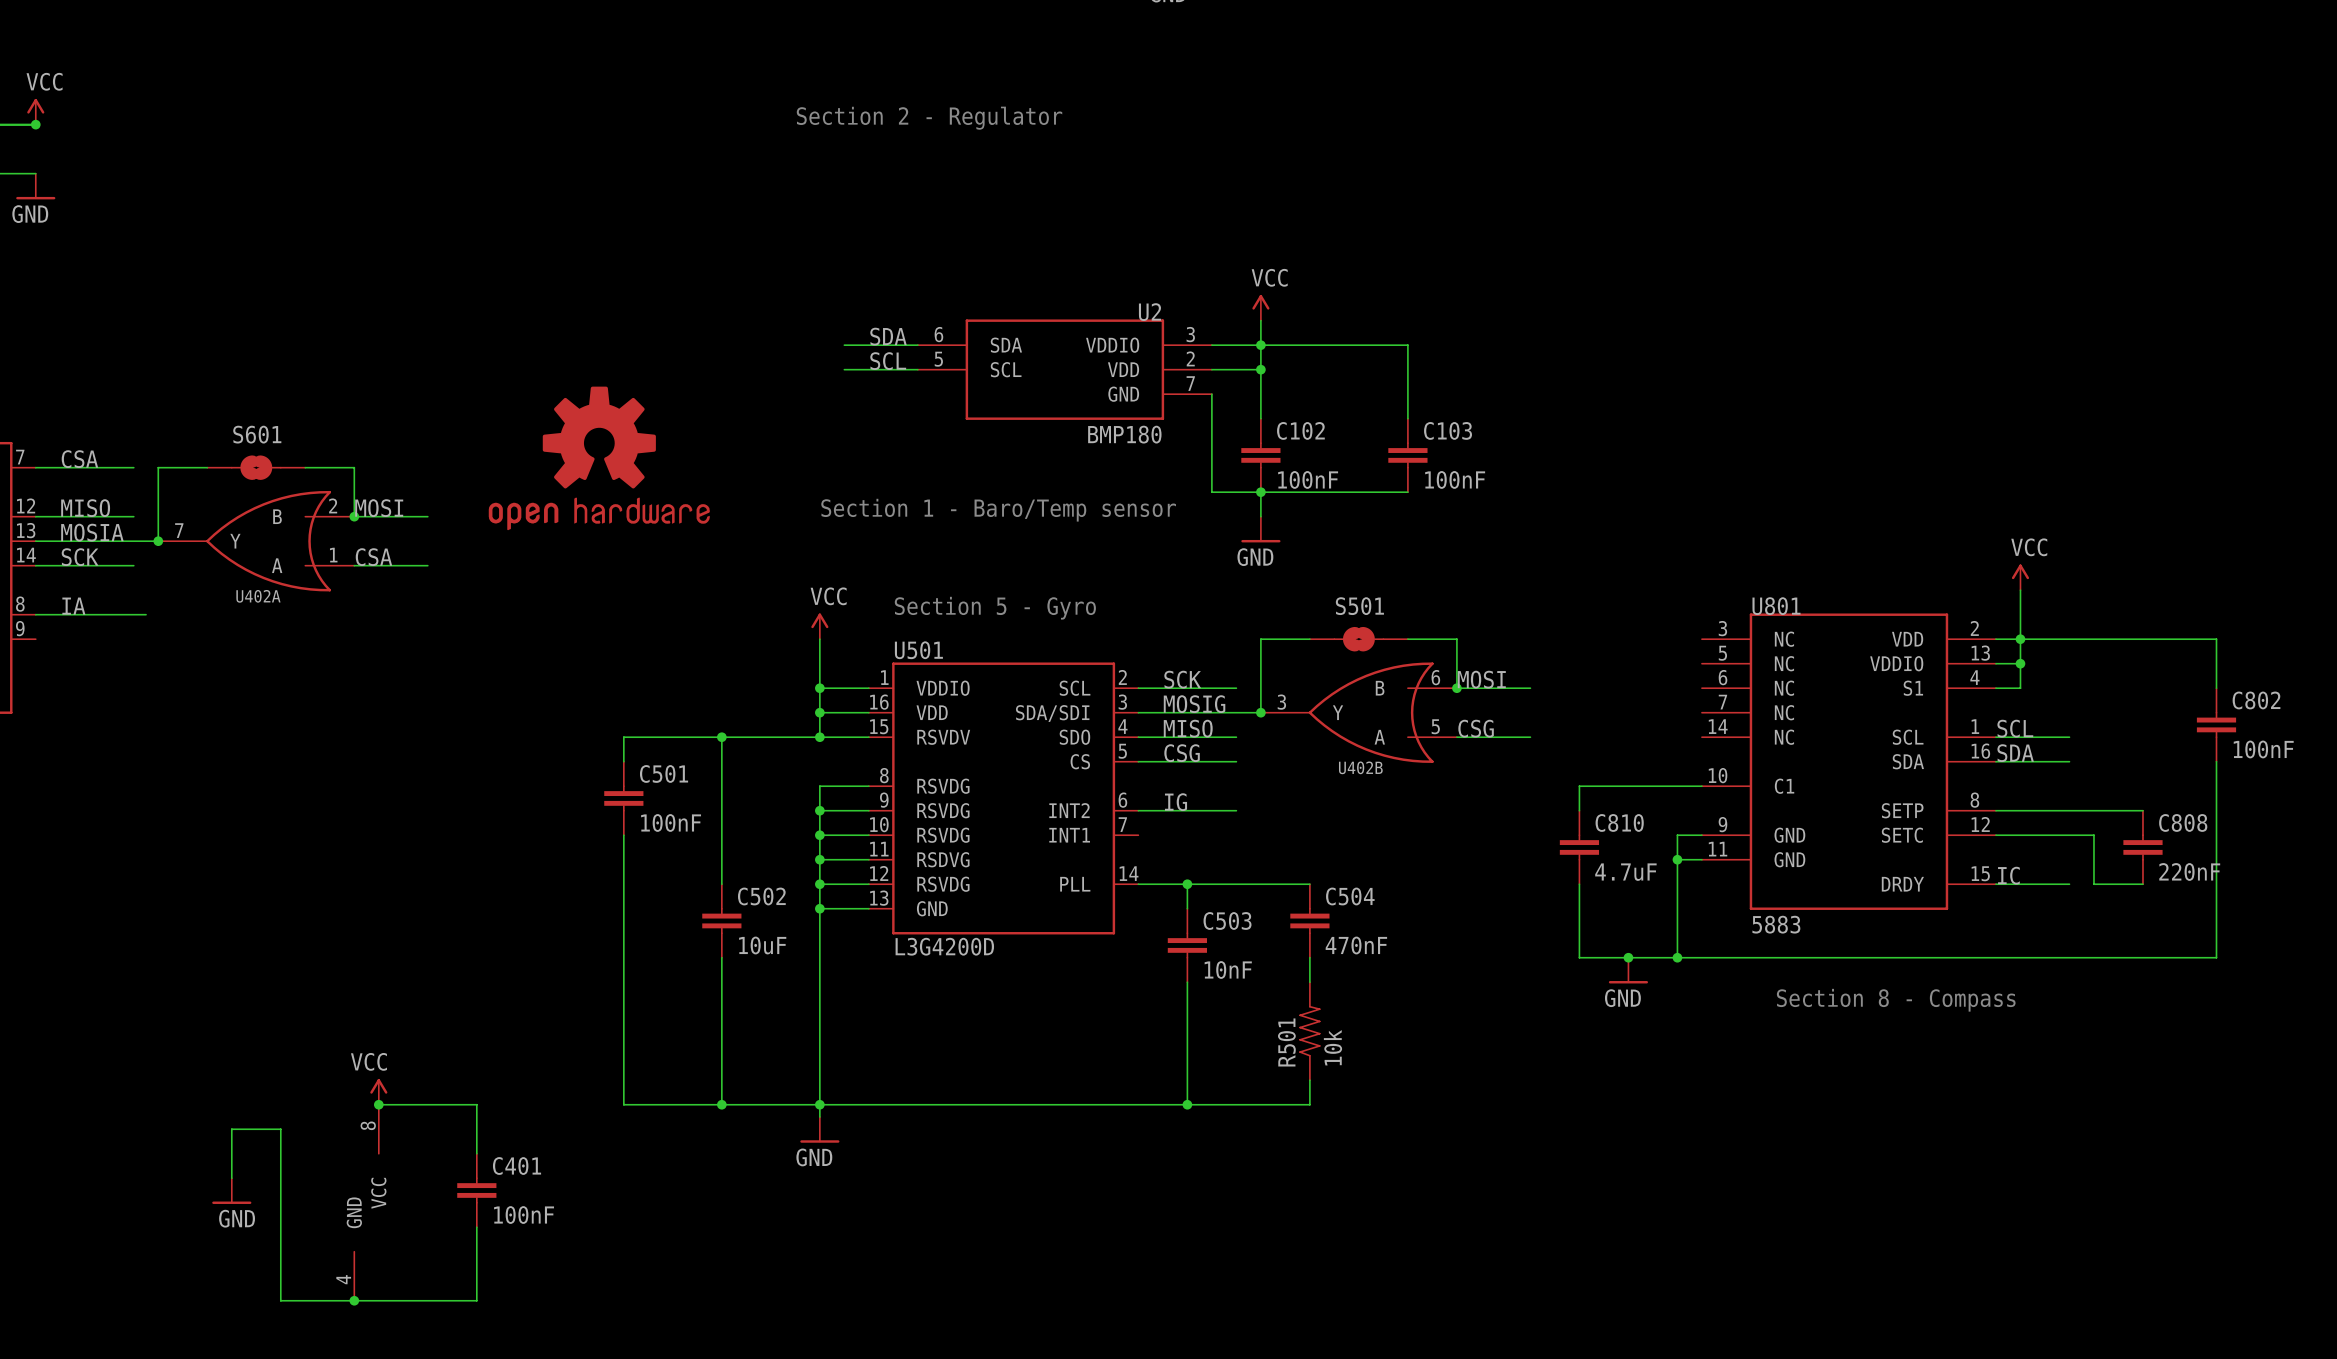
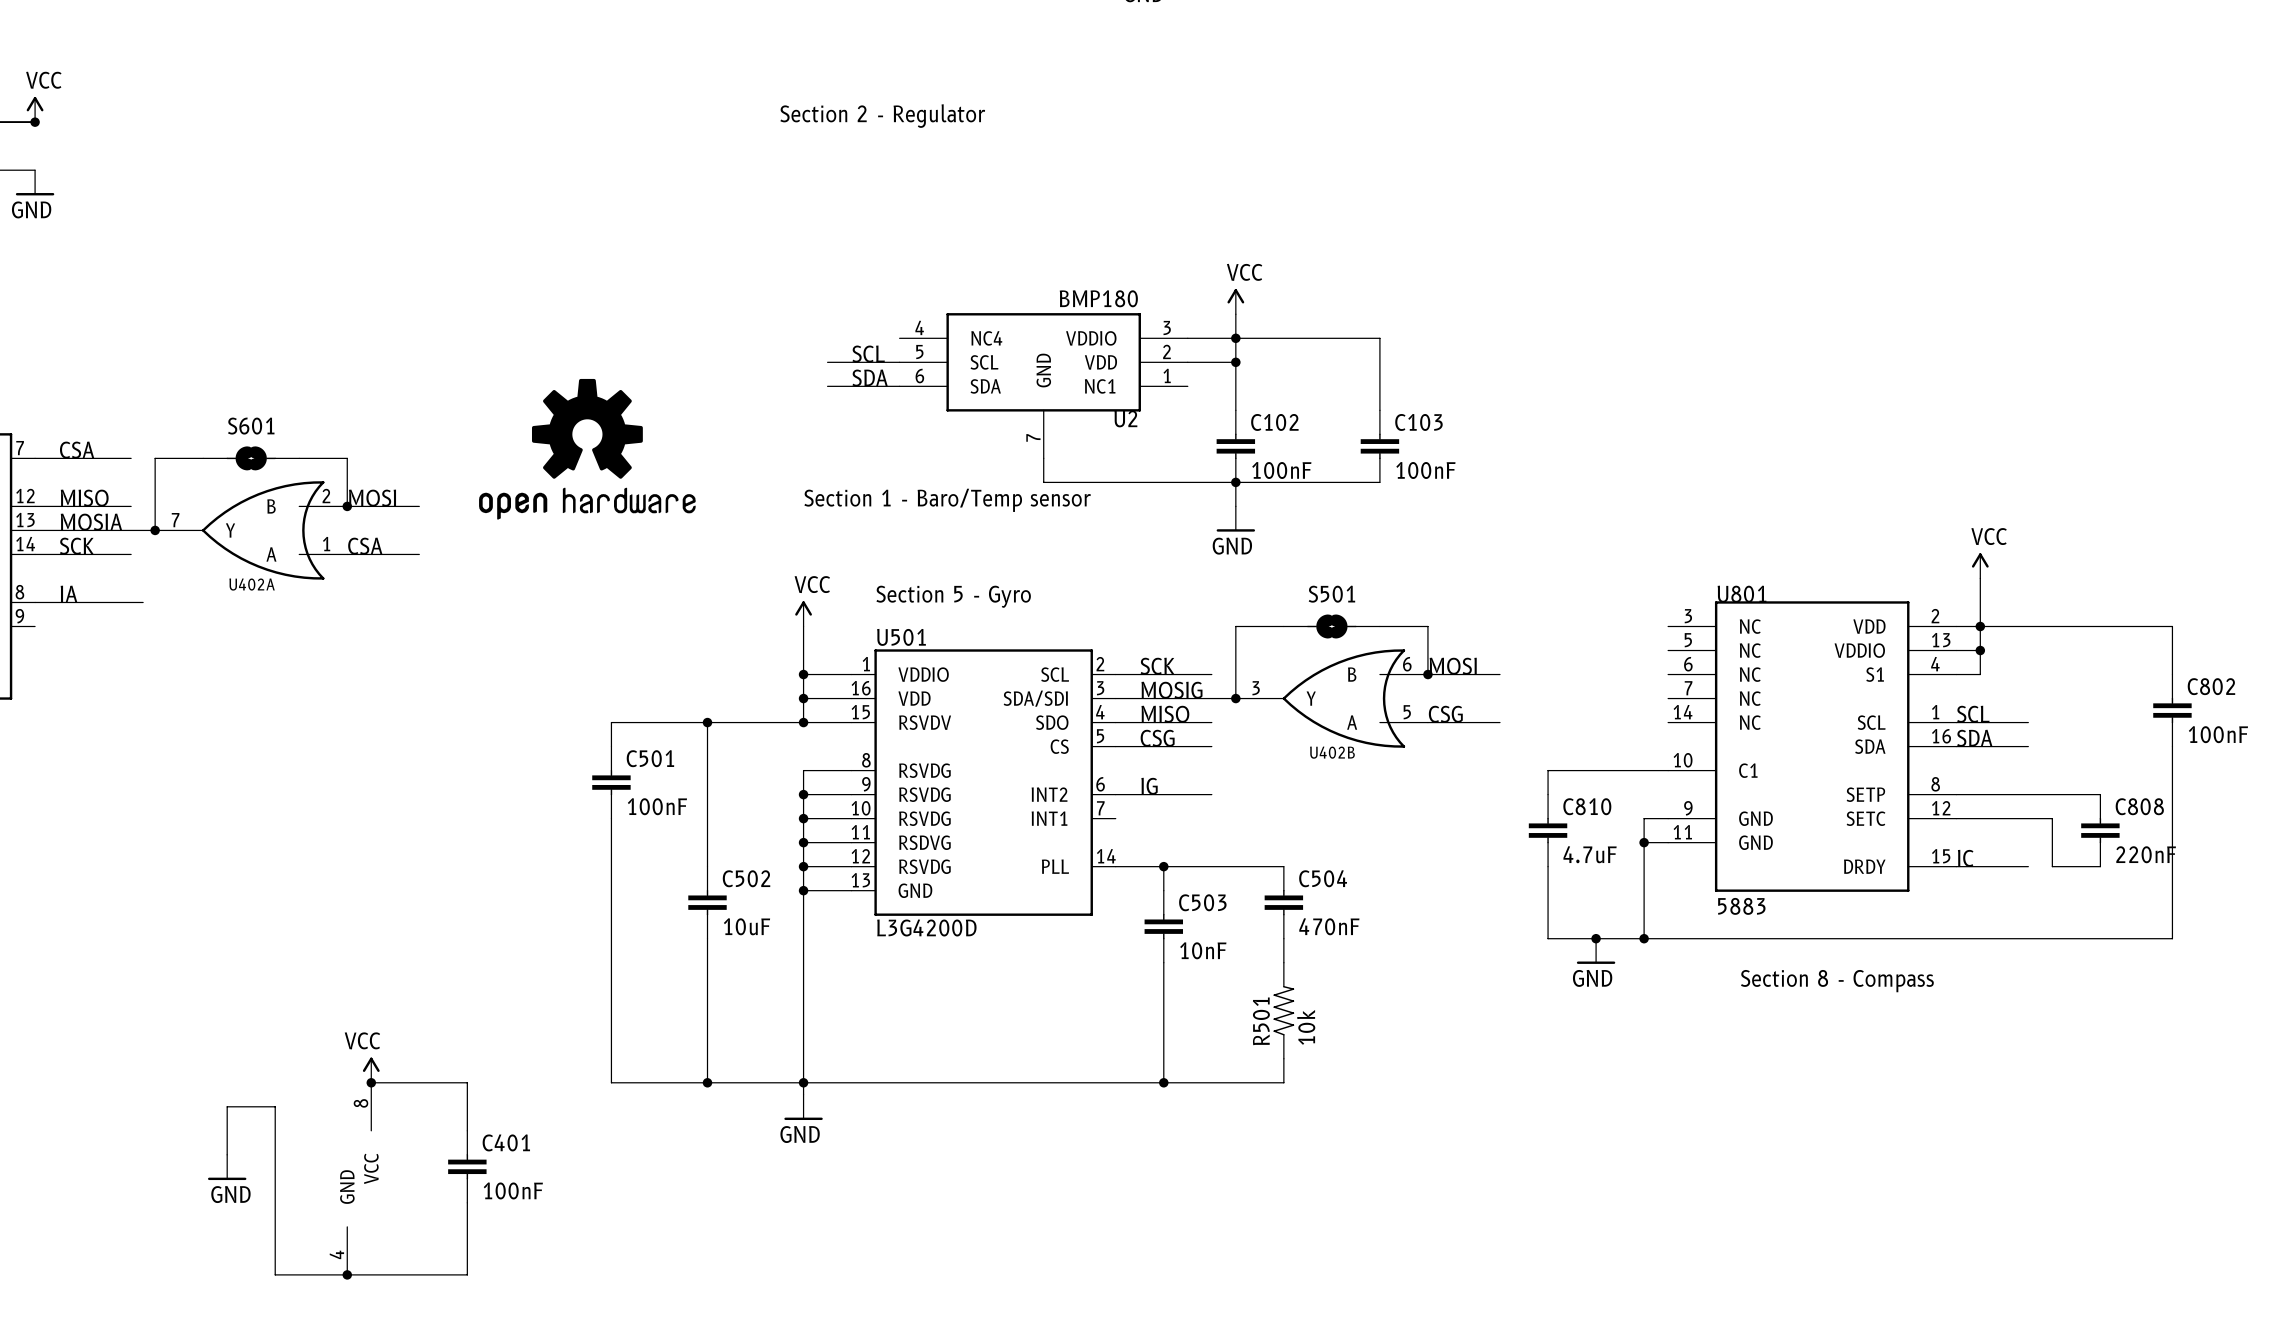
U2 name position: U2 (1150, 312) -> U2 (1125, 418)
U2 symbol: [917, 319, 1212, 420] -> [899, 313, 1188, 459]
label position: SDA (888, 336) -> SDA (870, 378)
wire: (844, 345) (917, 345) -> (827, 386) (899, 386)
wire: (1211, 394) (1211, 492) -> (1043, 458) (1043, 482) (1187, 482)
U2 value position: BMP180 (1124, 434) -> BMP180 (1098, 298)

